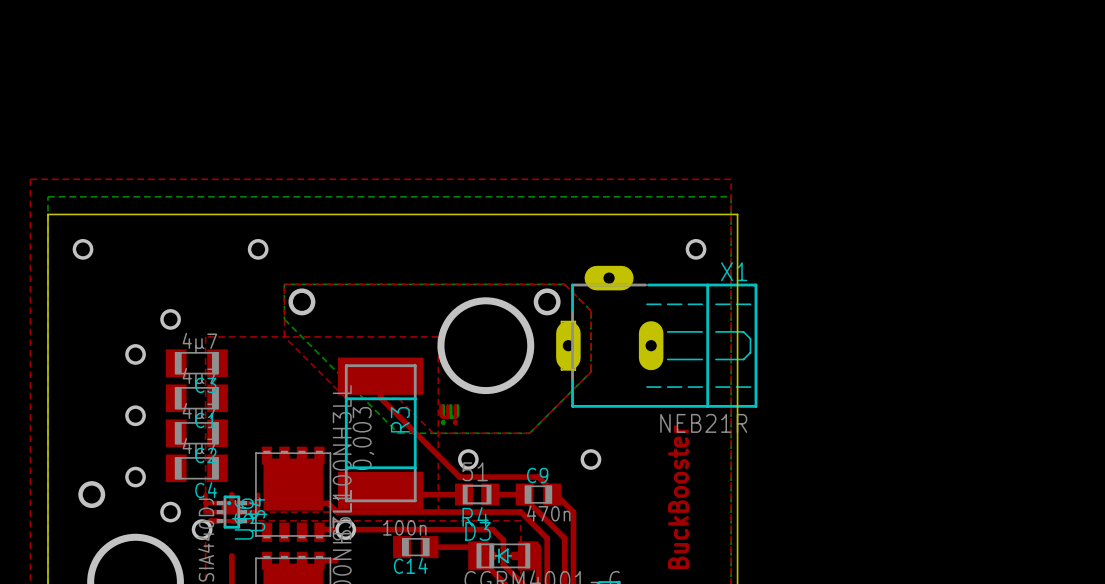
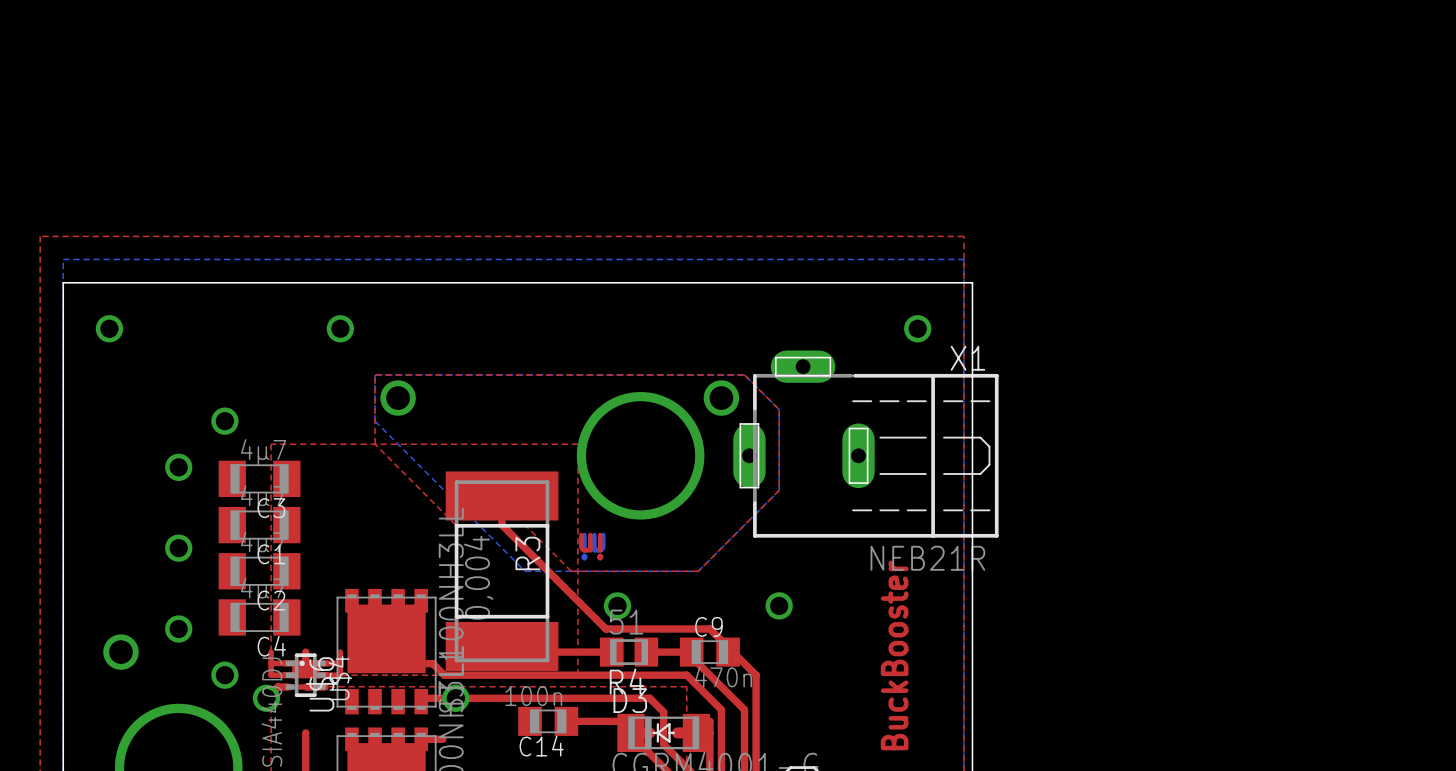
R3 value: 0,003 (363, 438) -> 0,004 (478, 577)

